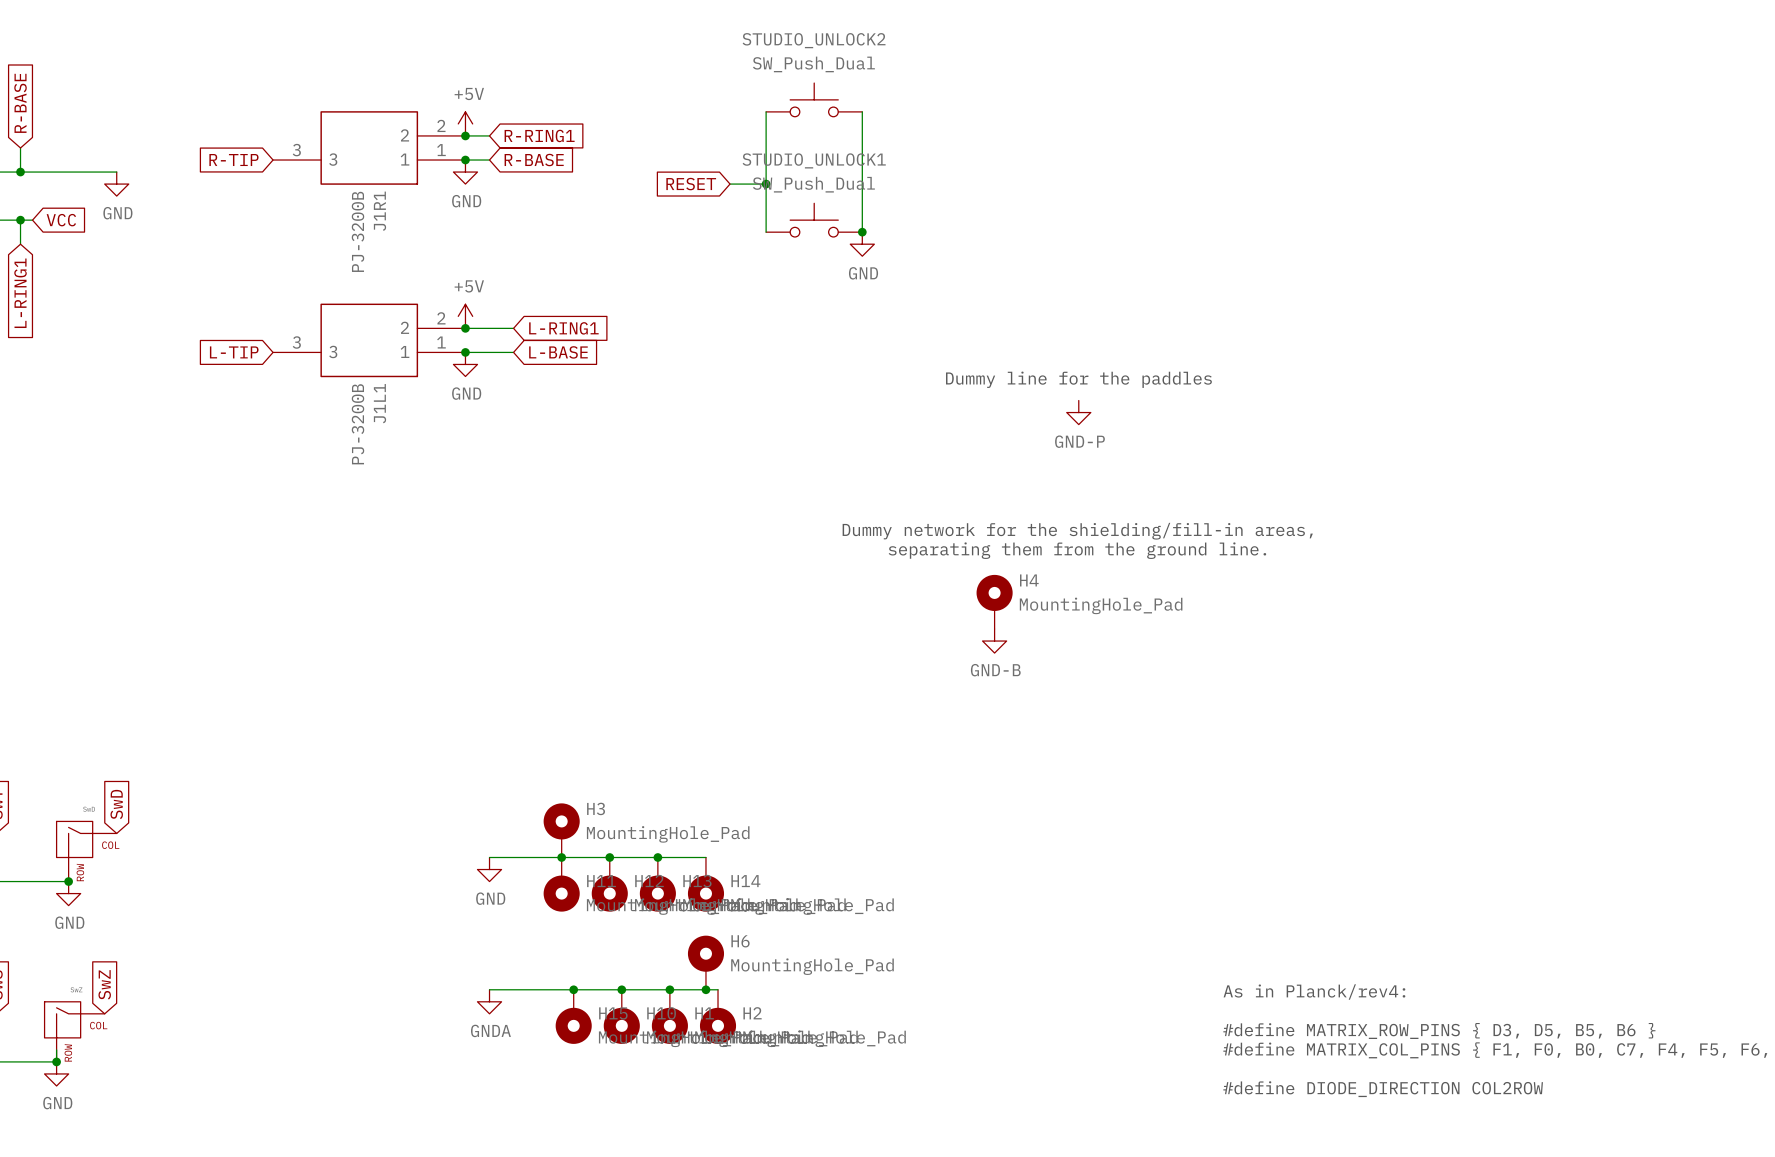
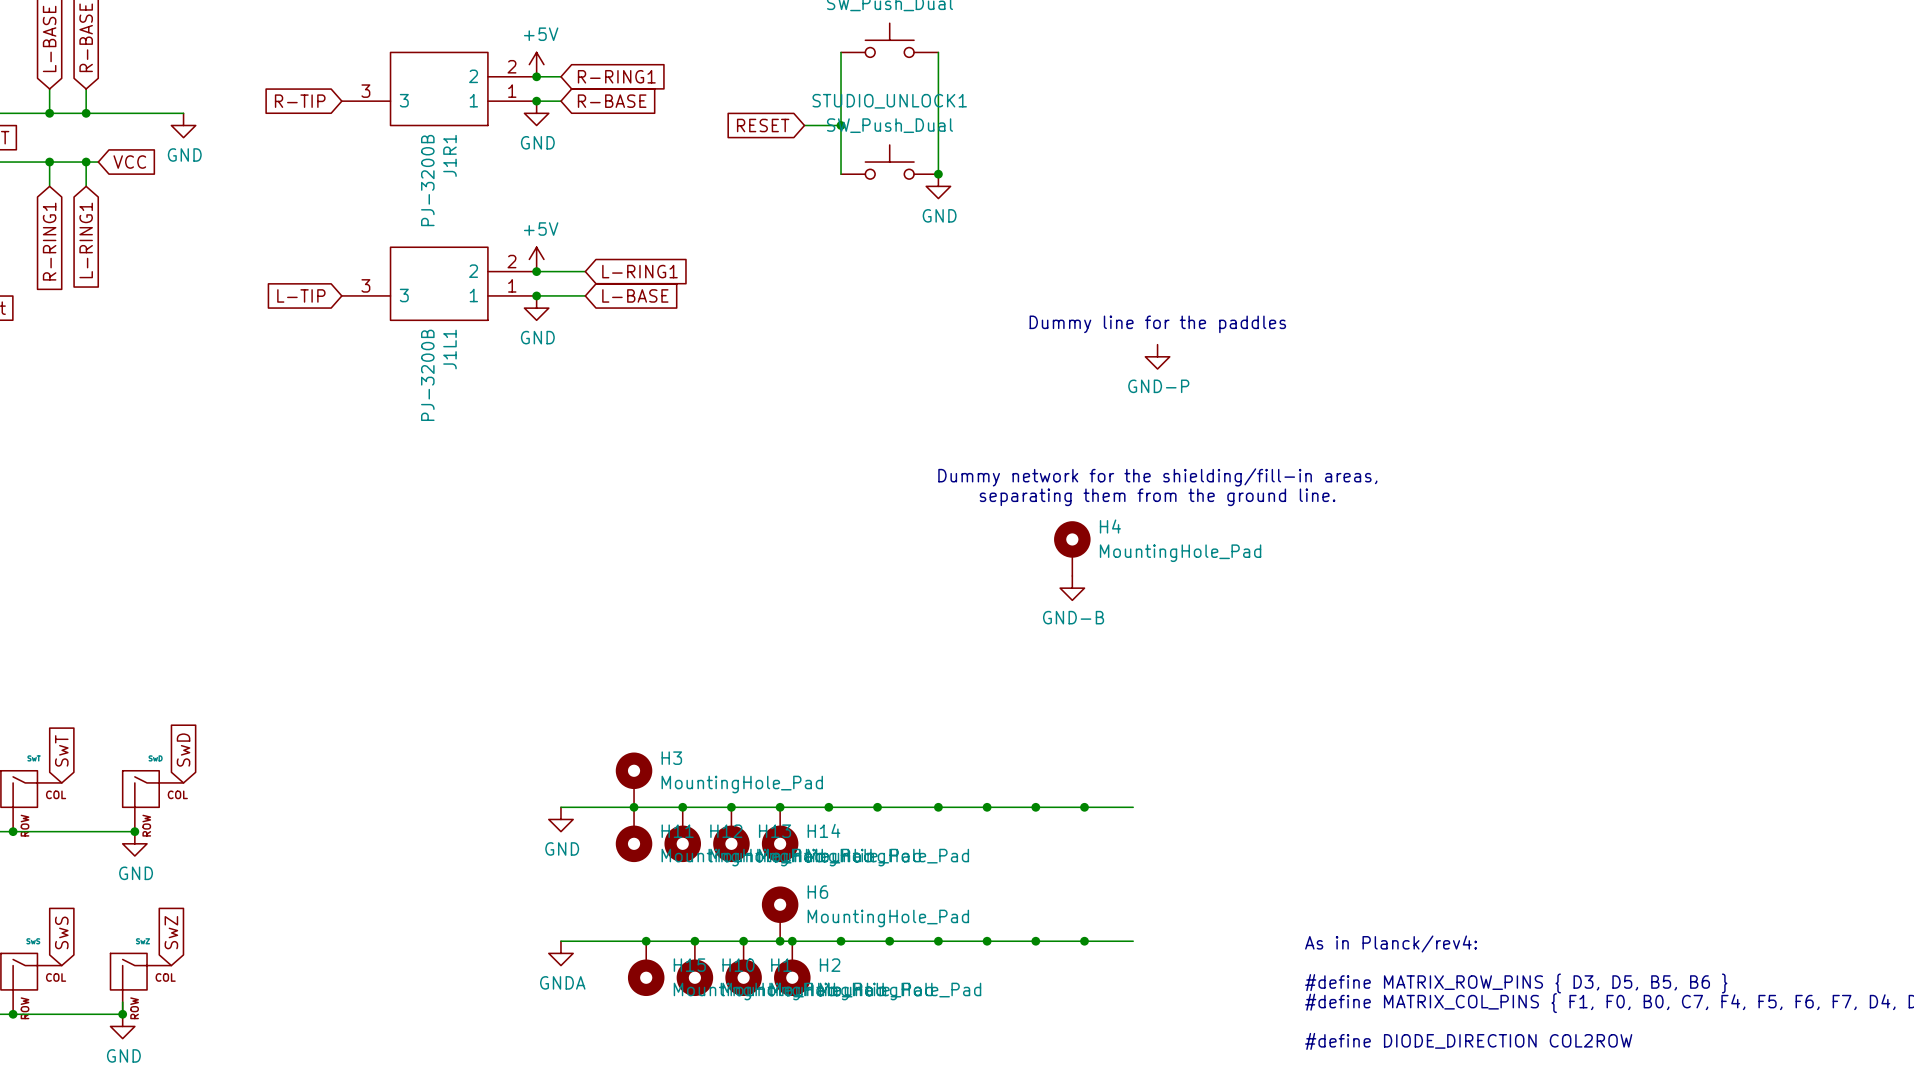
wire: none -> (780, 807) (1133, 807)
junction: none -> (780, 807)
junction: none -> (828, 807)
junction: none -> (877, 807)
junction: none -> (938, 807)
junction: none -> (987, 807)
junction: none -> (1035, 807)
junction: none -> (1084, 807)
wire: none -> (792, 941) (1133, 941)
junction: none -> (792, 941)
junction: none -> (841, 941)
junction: none -> (889, 941)
junction: none -> (938, 941)
junction: none -> (987, 941)
junction: none -> (1035, 941)
junction: none -> (1084, 941)

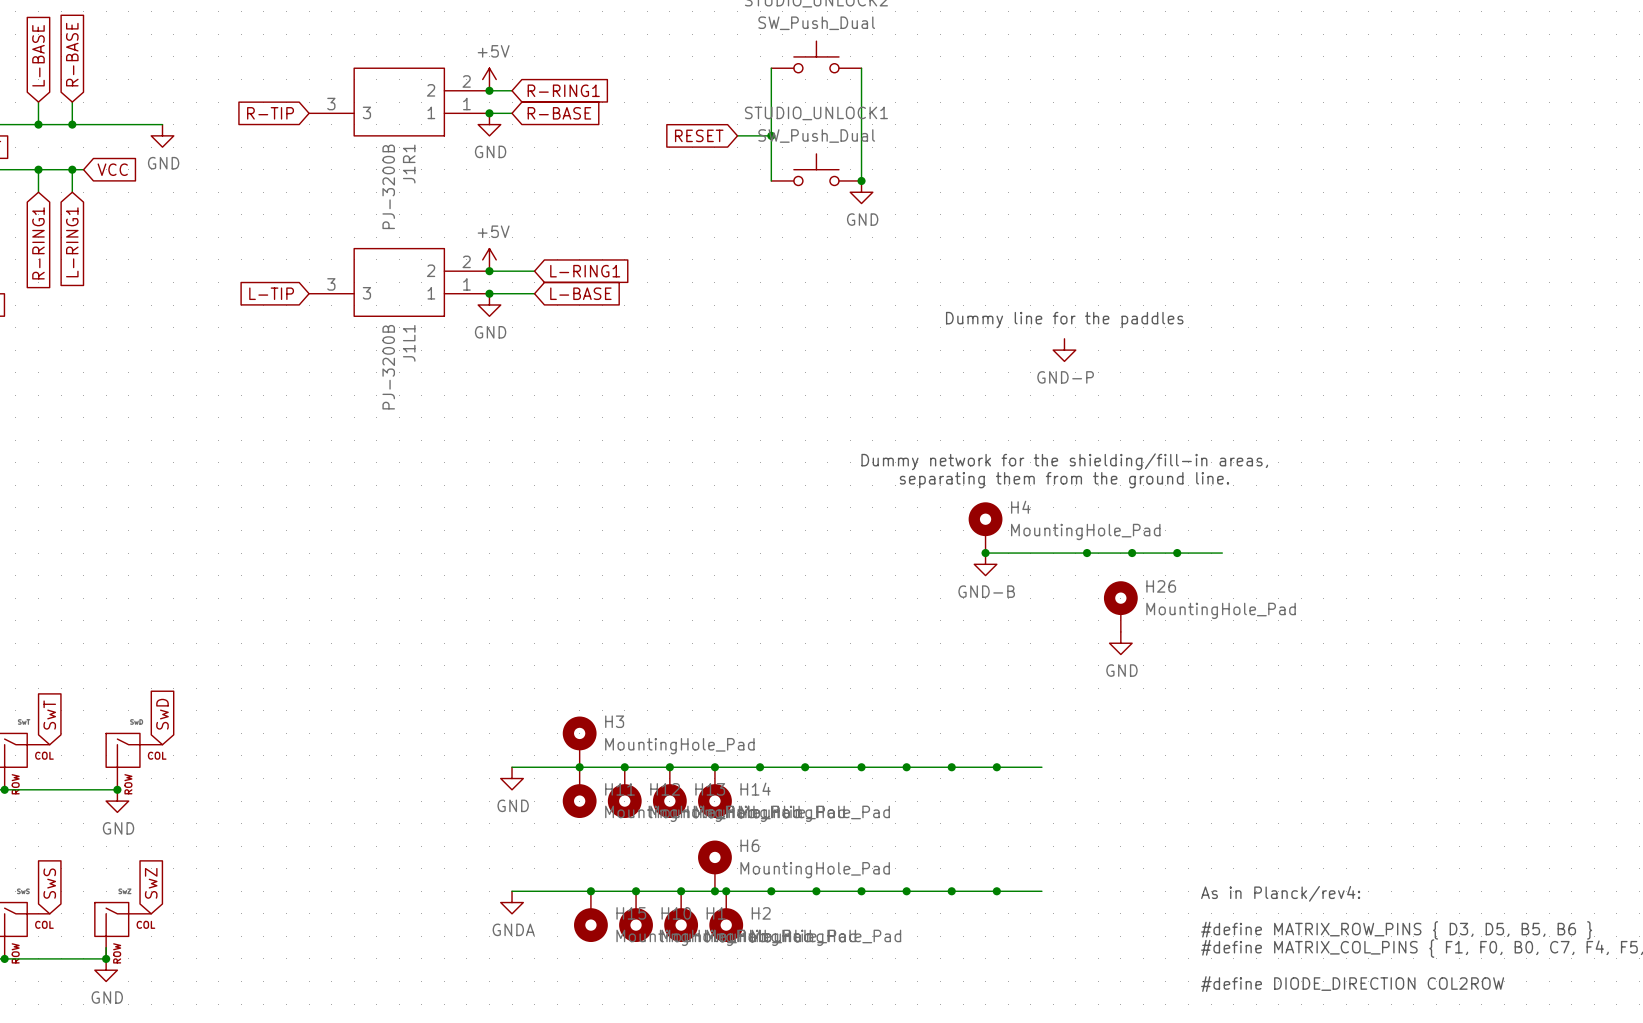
wire: none -> (985, 553) (1222, 553)
junction: none -> (985, 553)
junction: none -> (1087, 553)
junction: none -> (1132, 553)
junction: none -> (1177, 553)
H26: none -> MountingHole_Pad (1120, 606)
power symbol: none -> GND (1120, 643)

